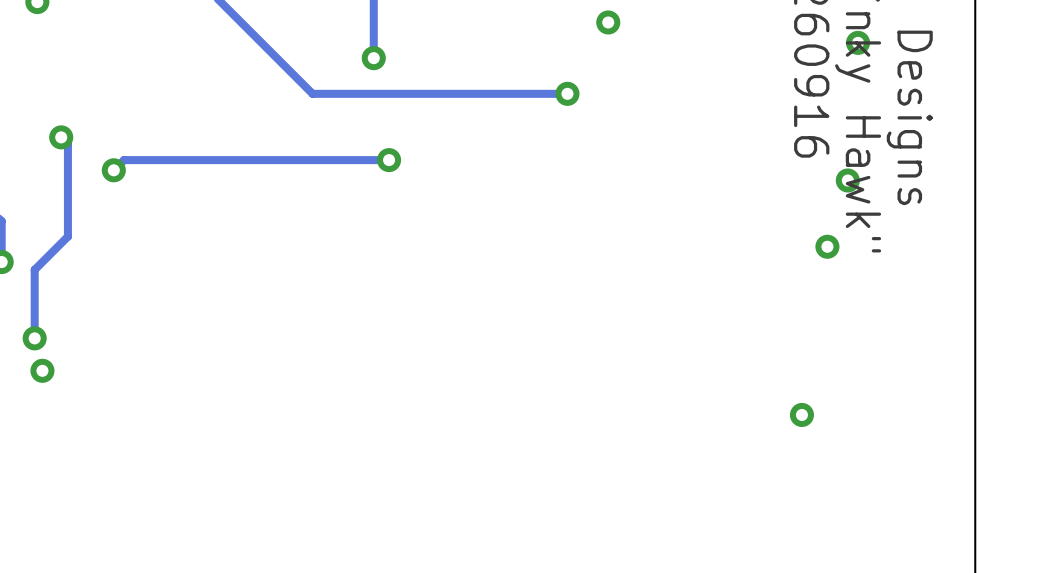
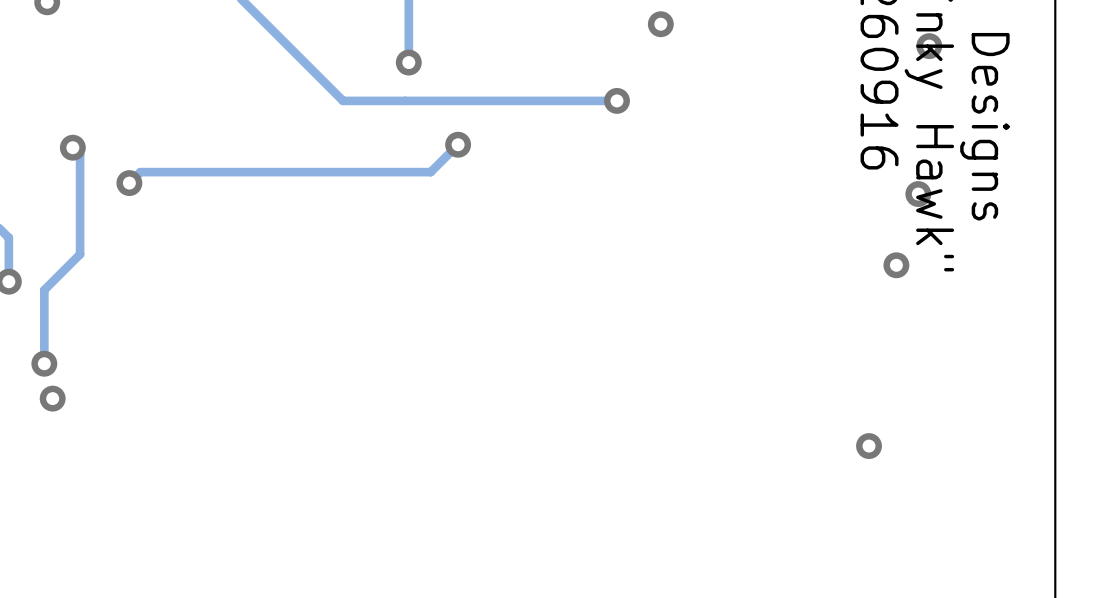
track: none -> (458, 144) (430, 172) (425, 172)
via position: (389, 160) -> (458, 144)

